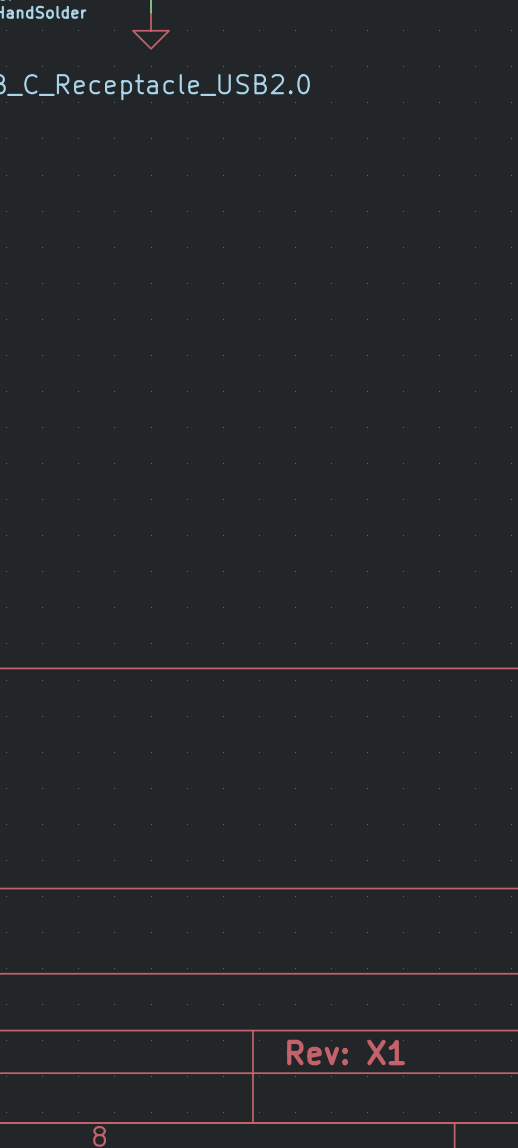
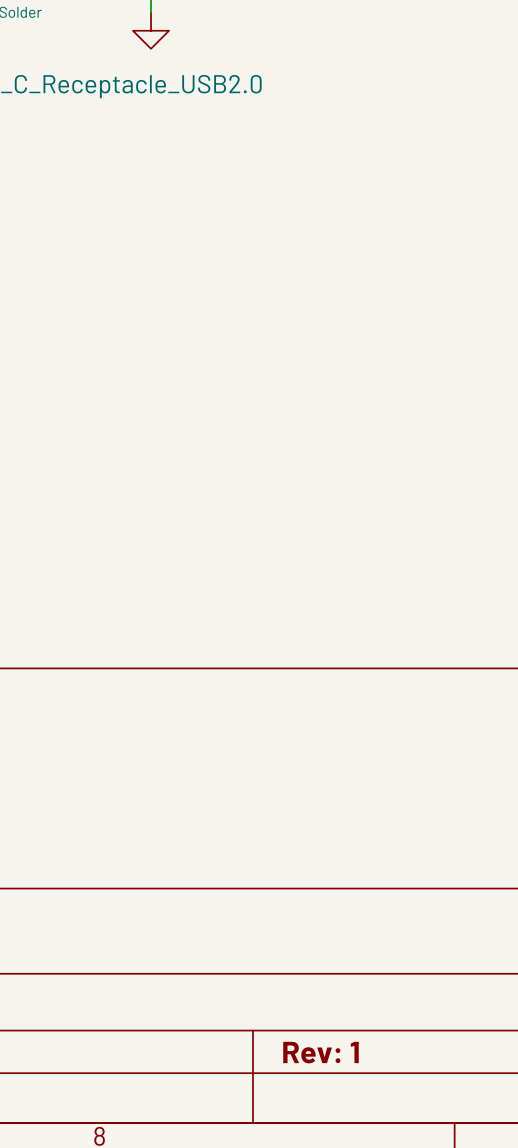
title block: Rev: X1 (346, 1052) -> Rev: 1 (320, 1052)

